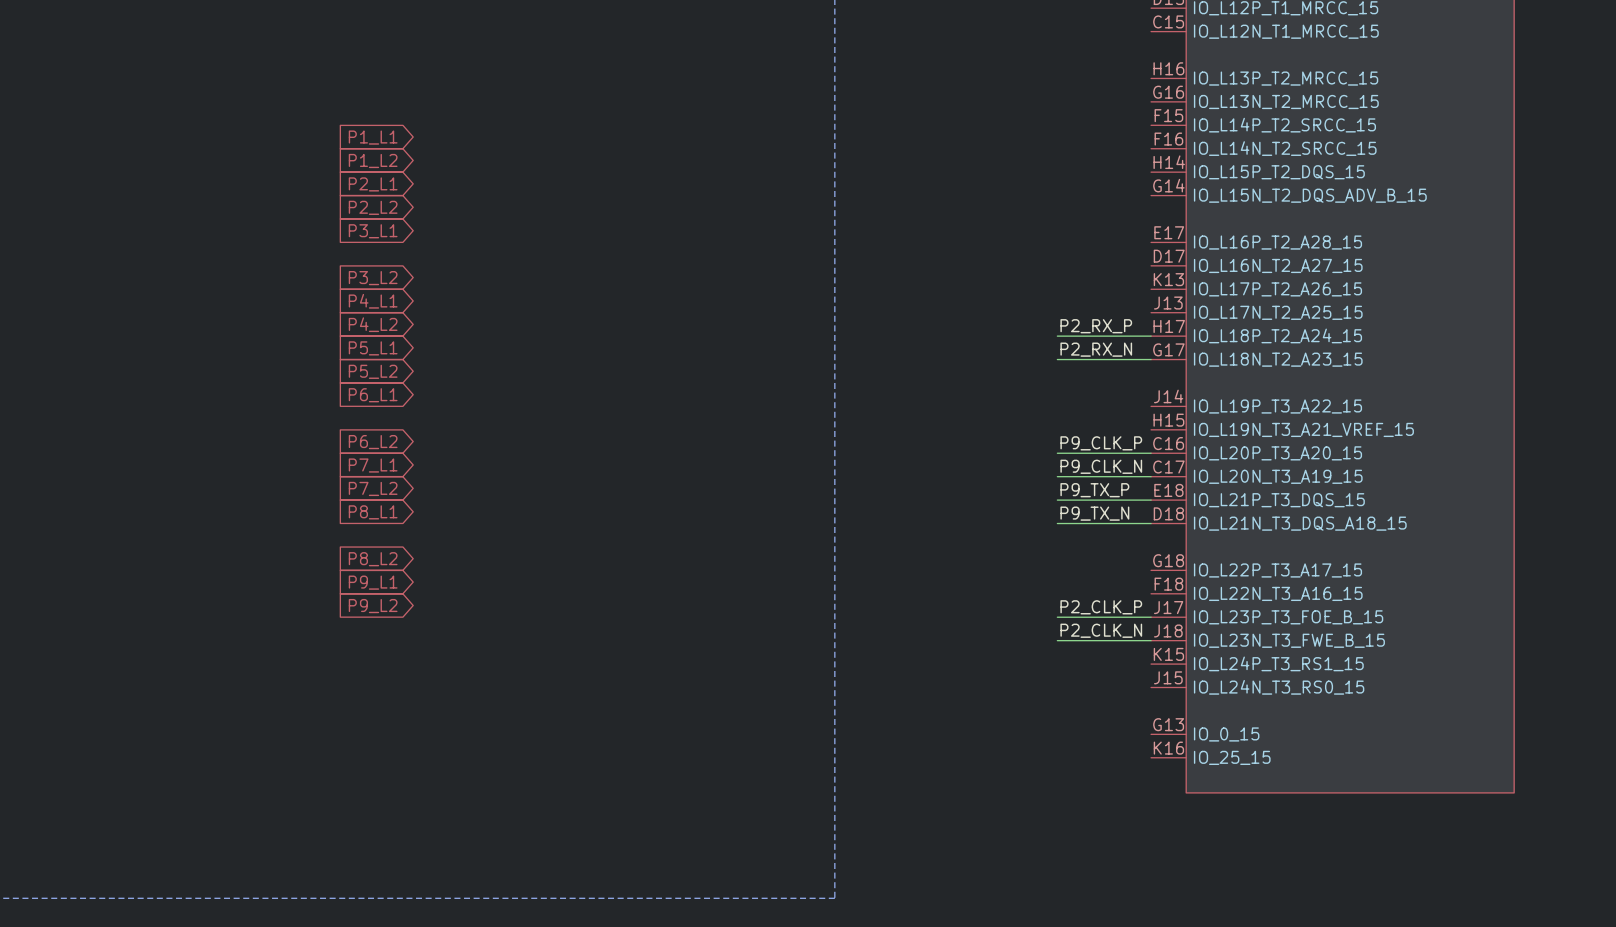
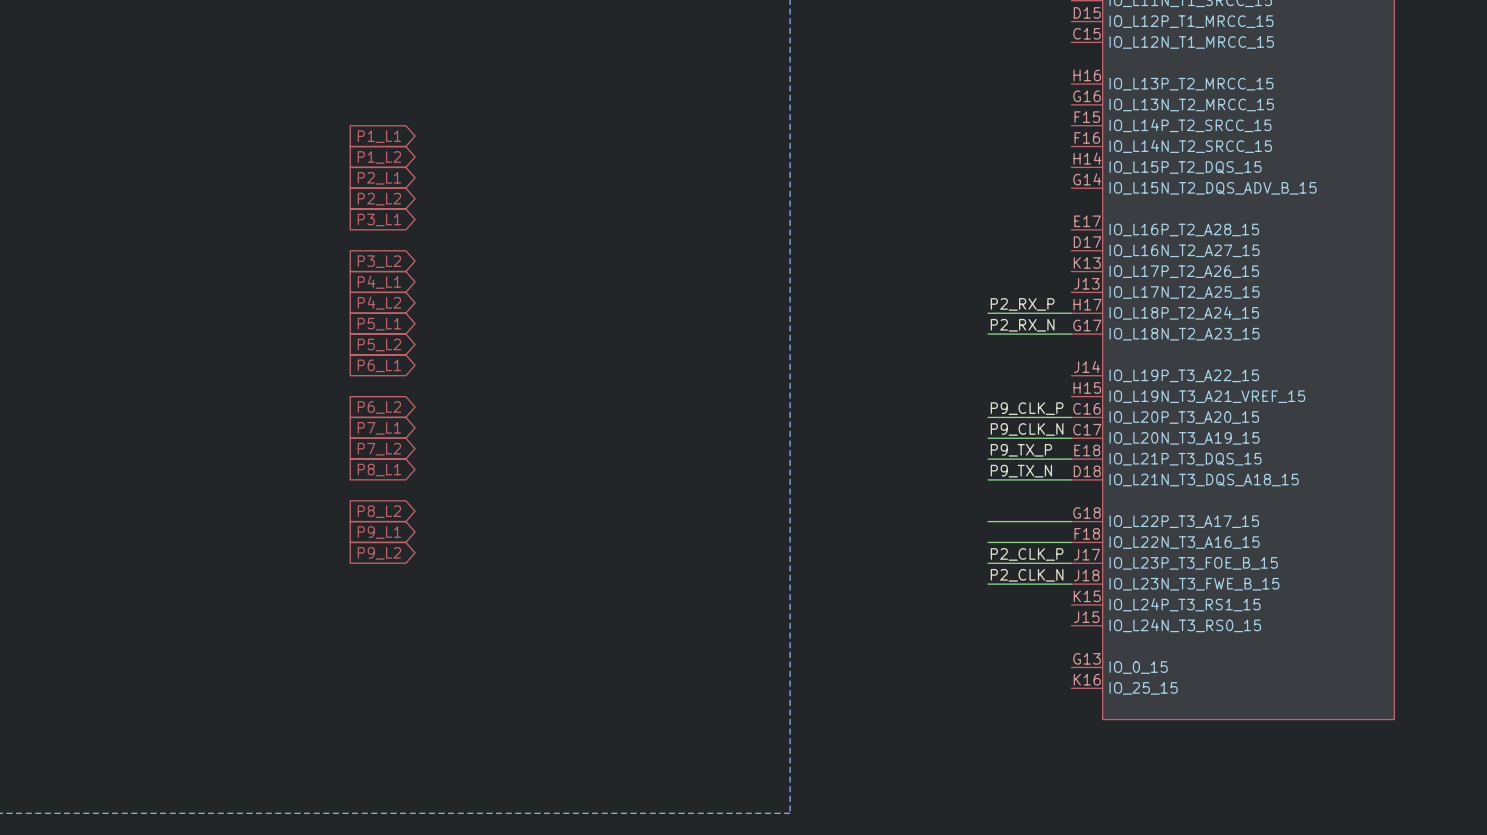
wire: none -> (988, 521) (1071, 521)
wire: none -> (988, 542) (1071, 542)

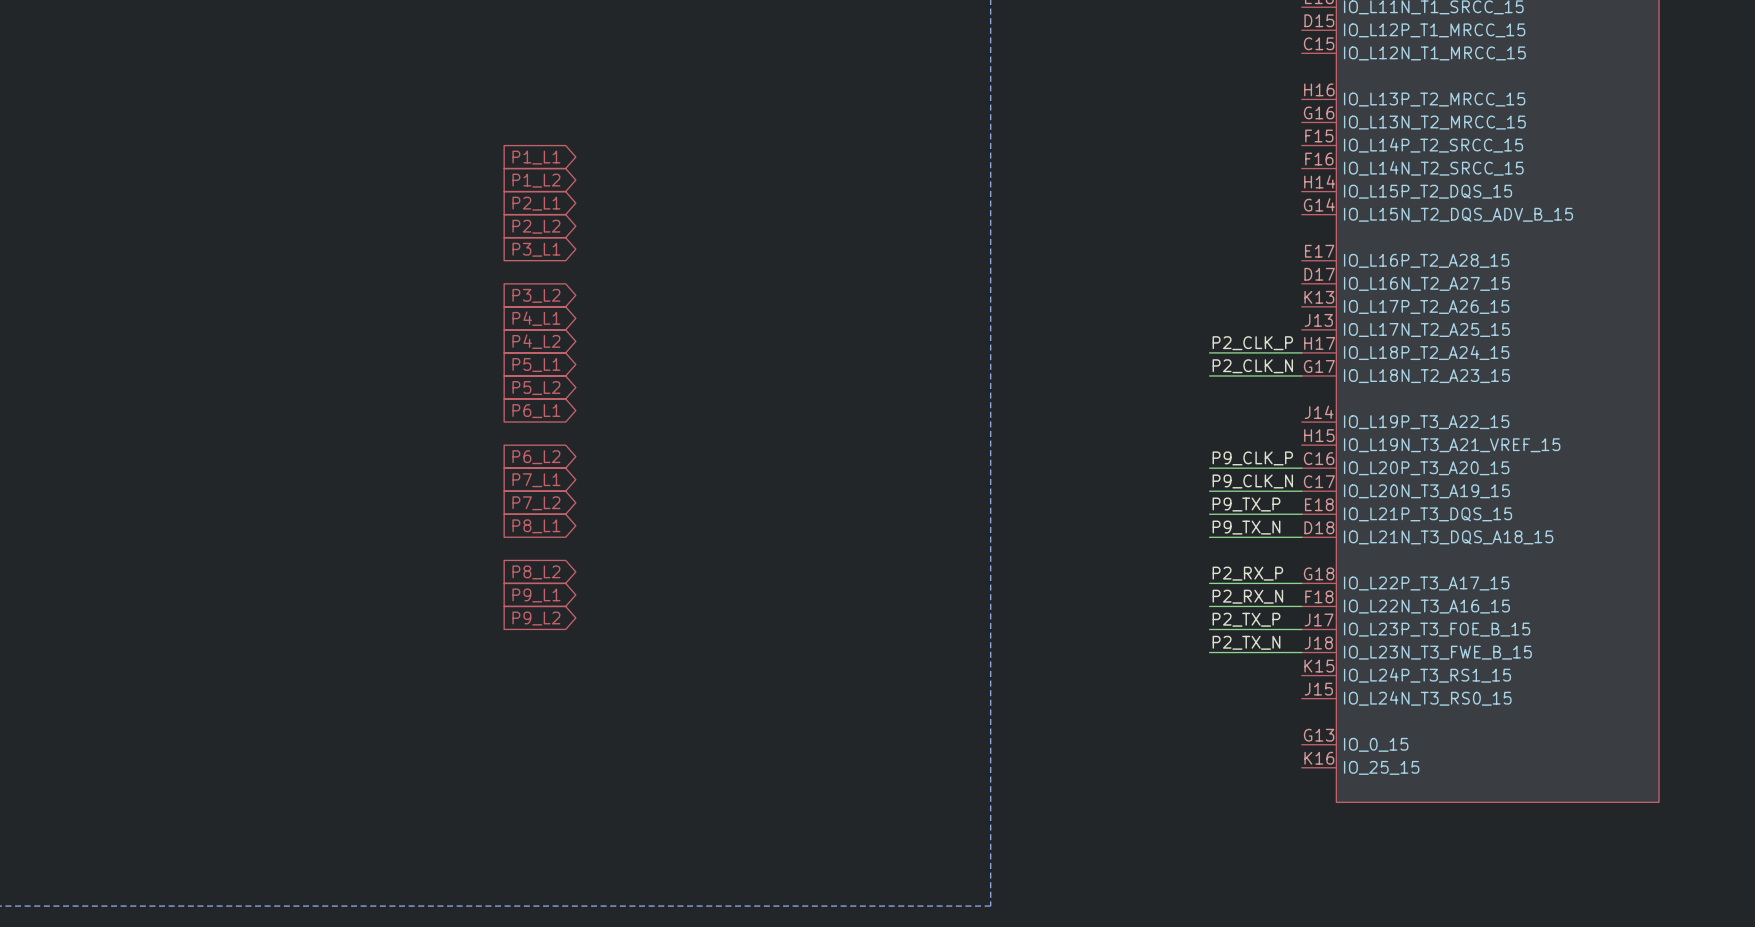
label: P2_RX_P (1022, 304) -> P2_CLK_P (1252, 343)
label: P2_RX_N (1022, 325) -> P2_CLK_N (1252, 366)
label: none -> P2_RX_P (1247, 573)
label: none -> P2_RX_N (1247, 596)
label: P2_CLK_P (1027, 554) -> P2_TX_P (1246, 619)
label: P2_CLK_N (1027, 575) -> P2_TX_N (1246, 642)

